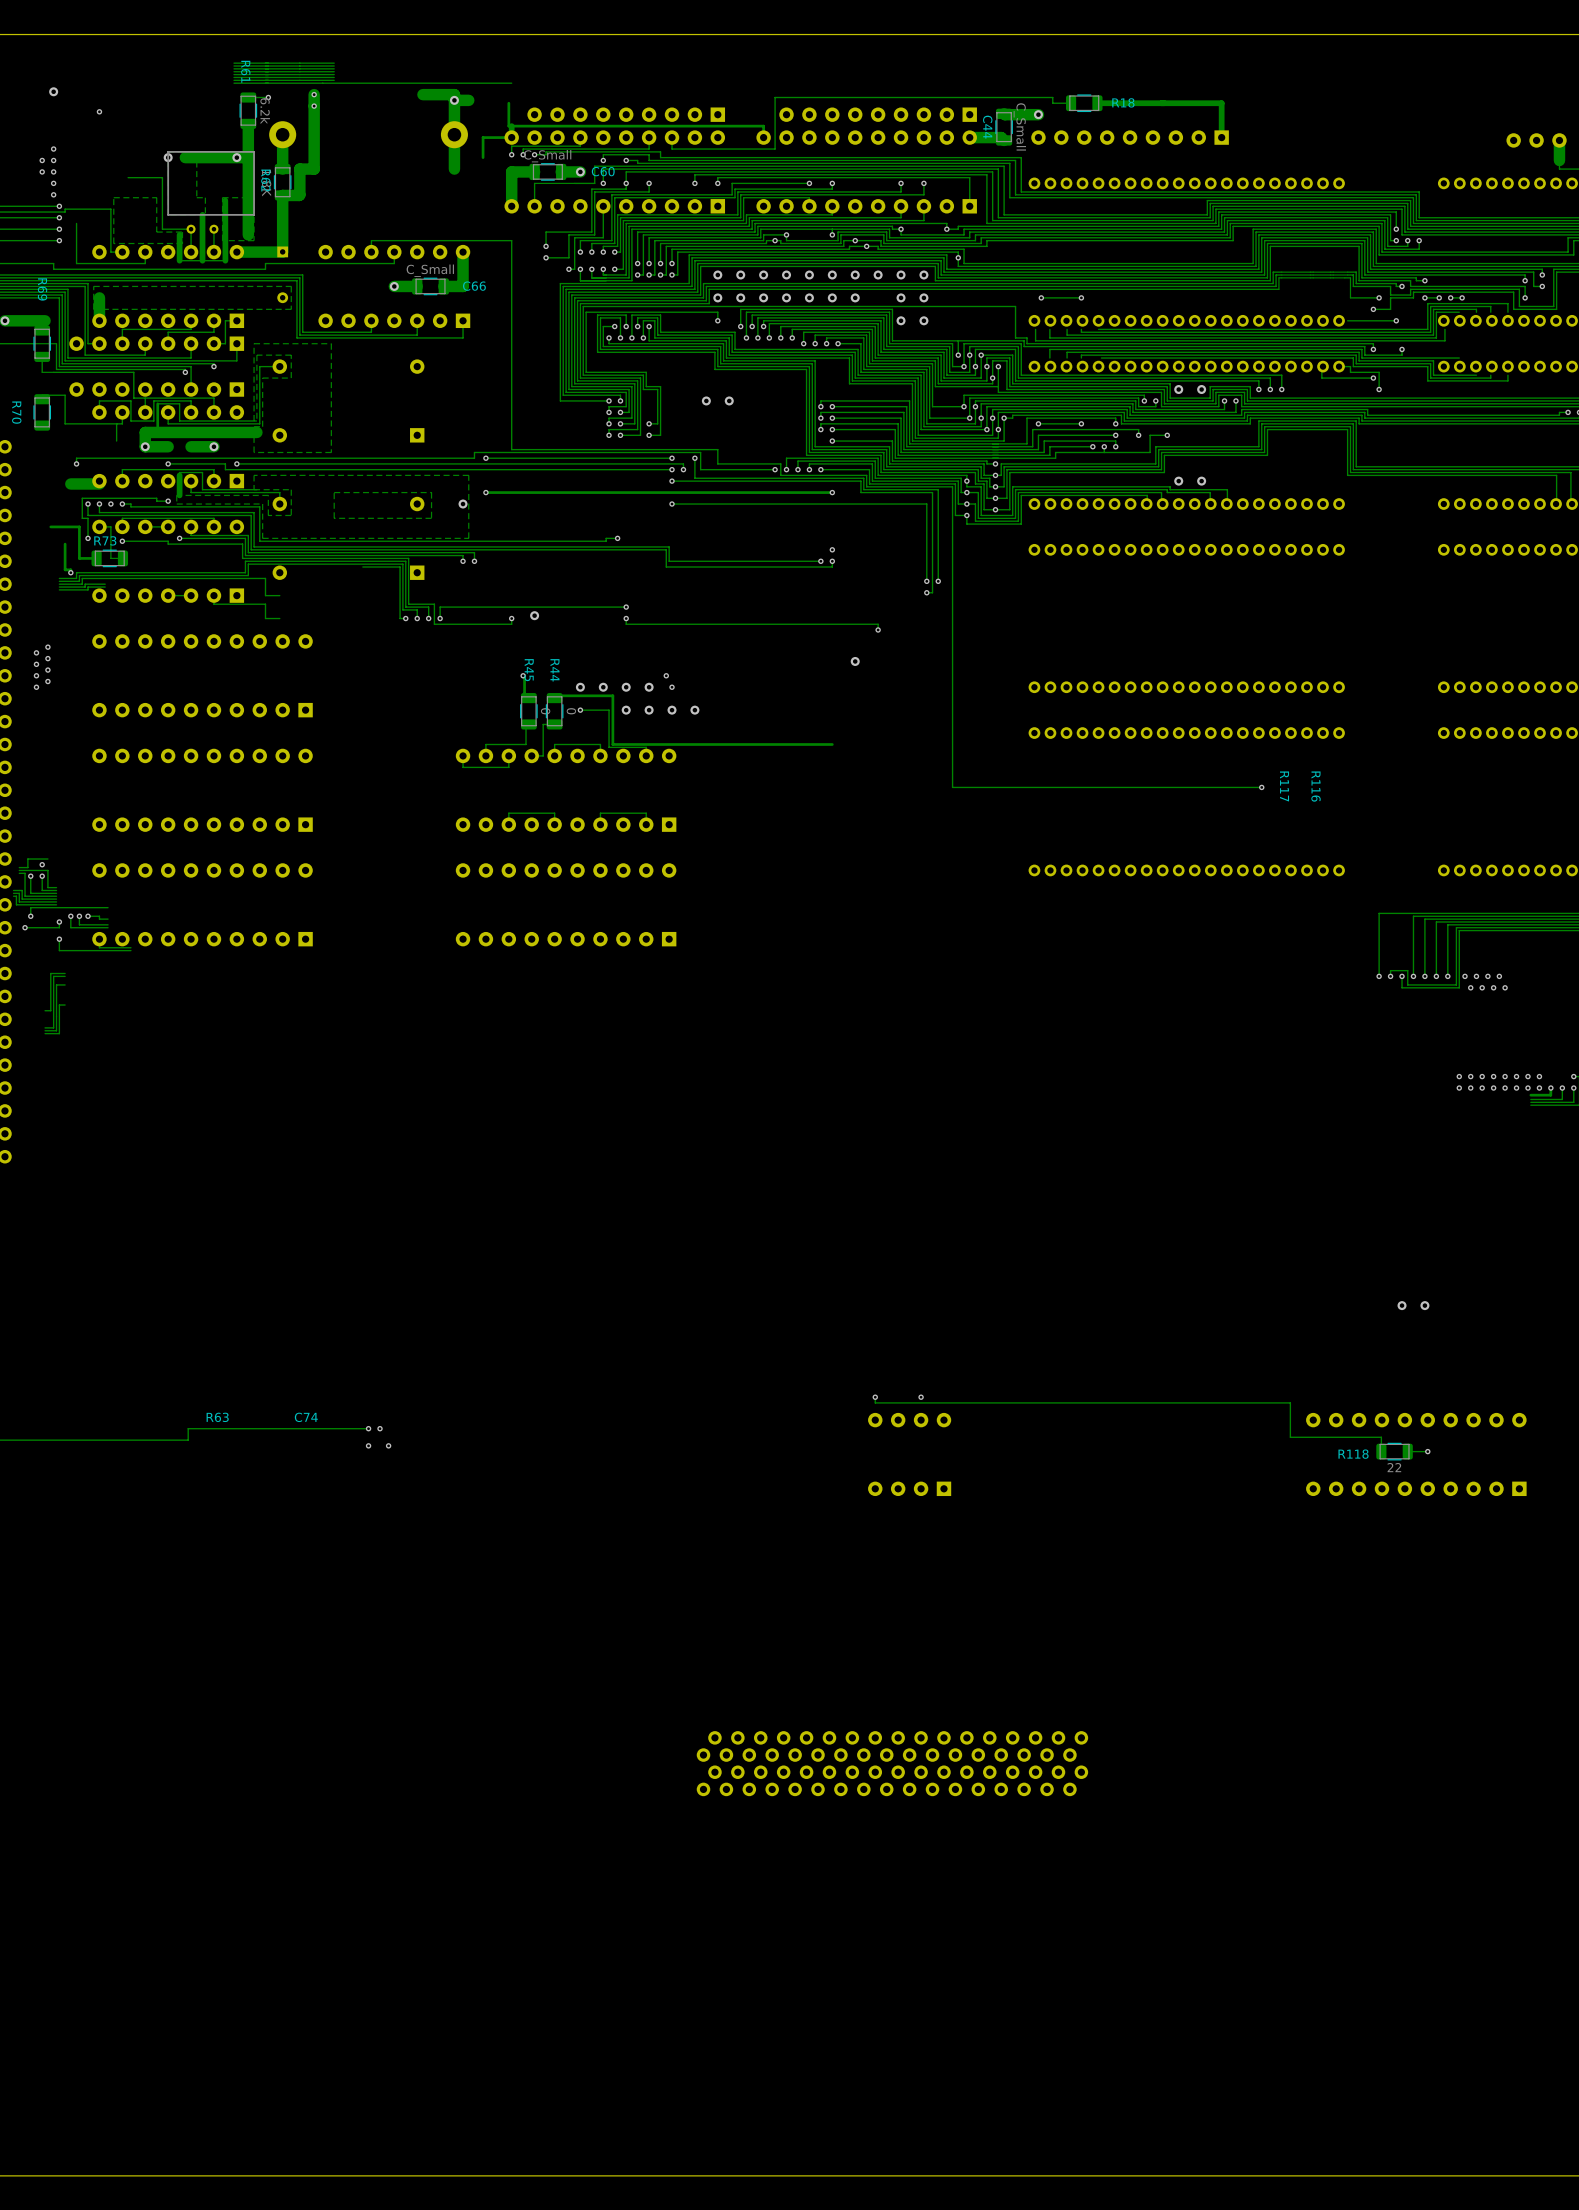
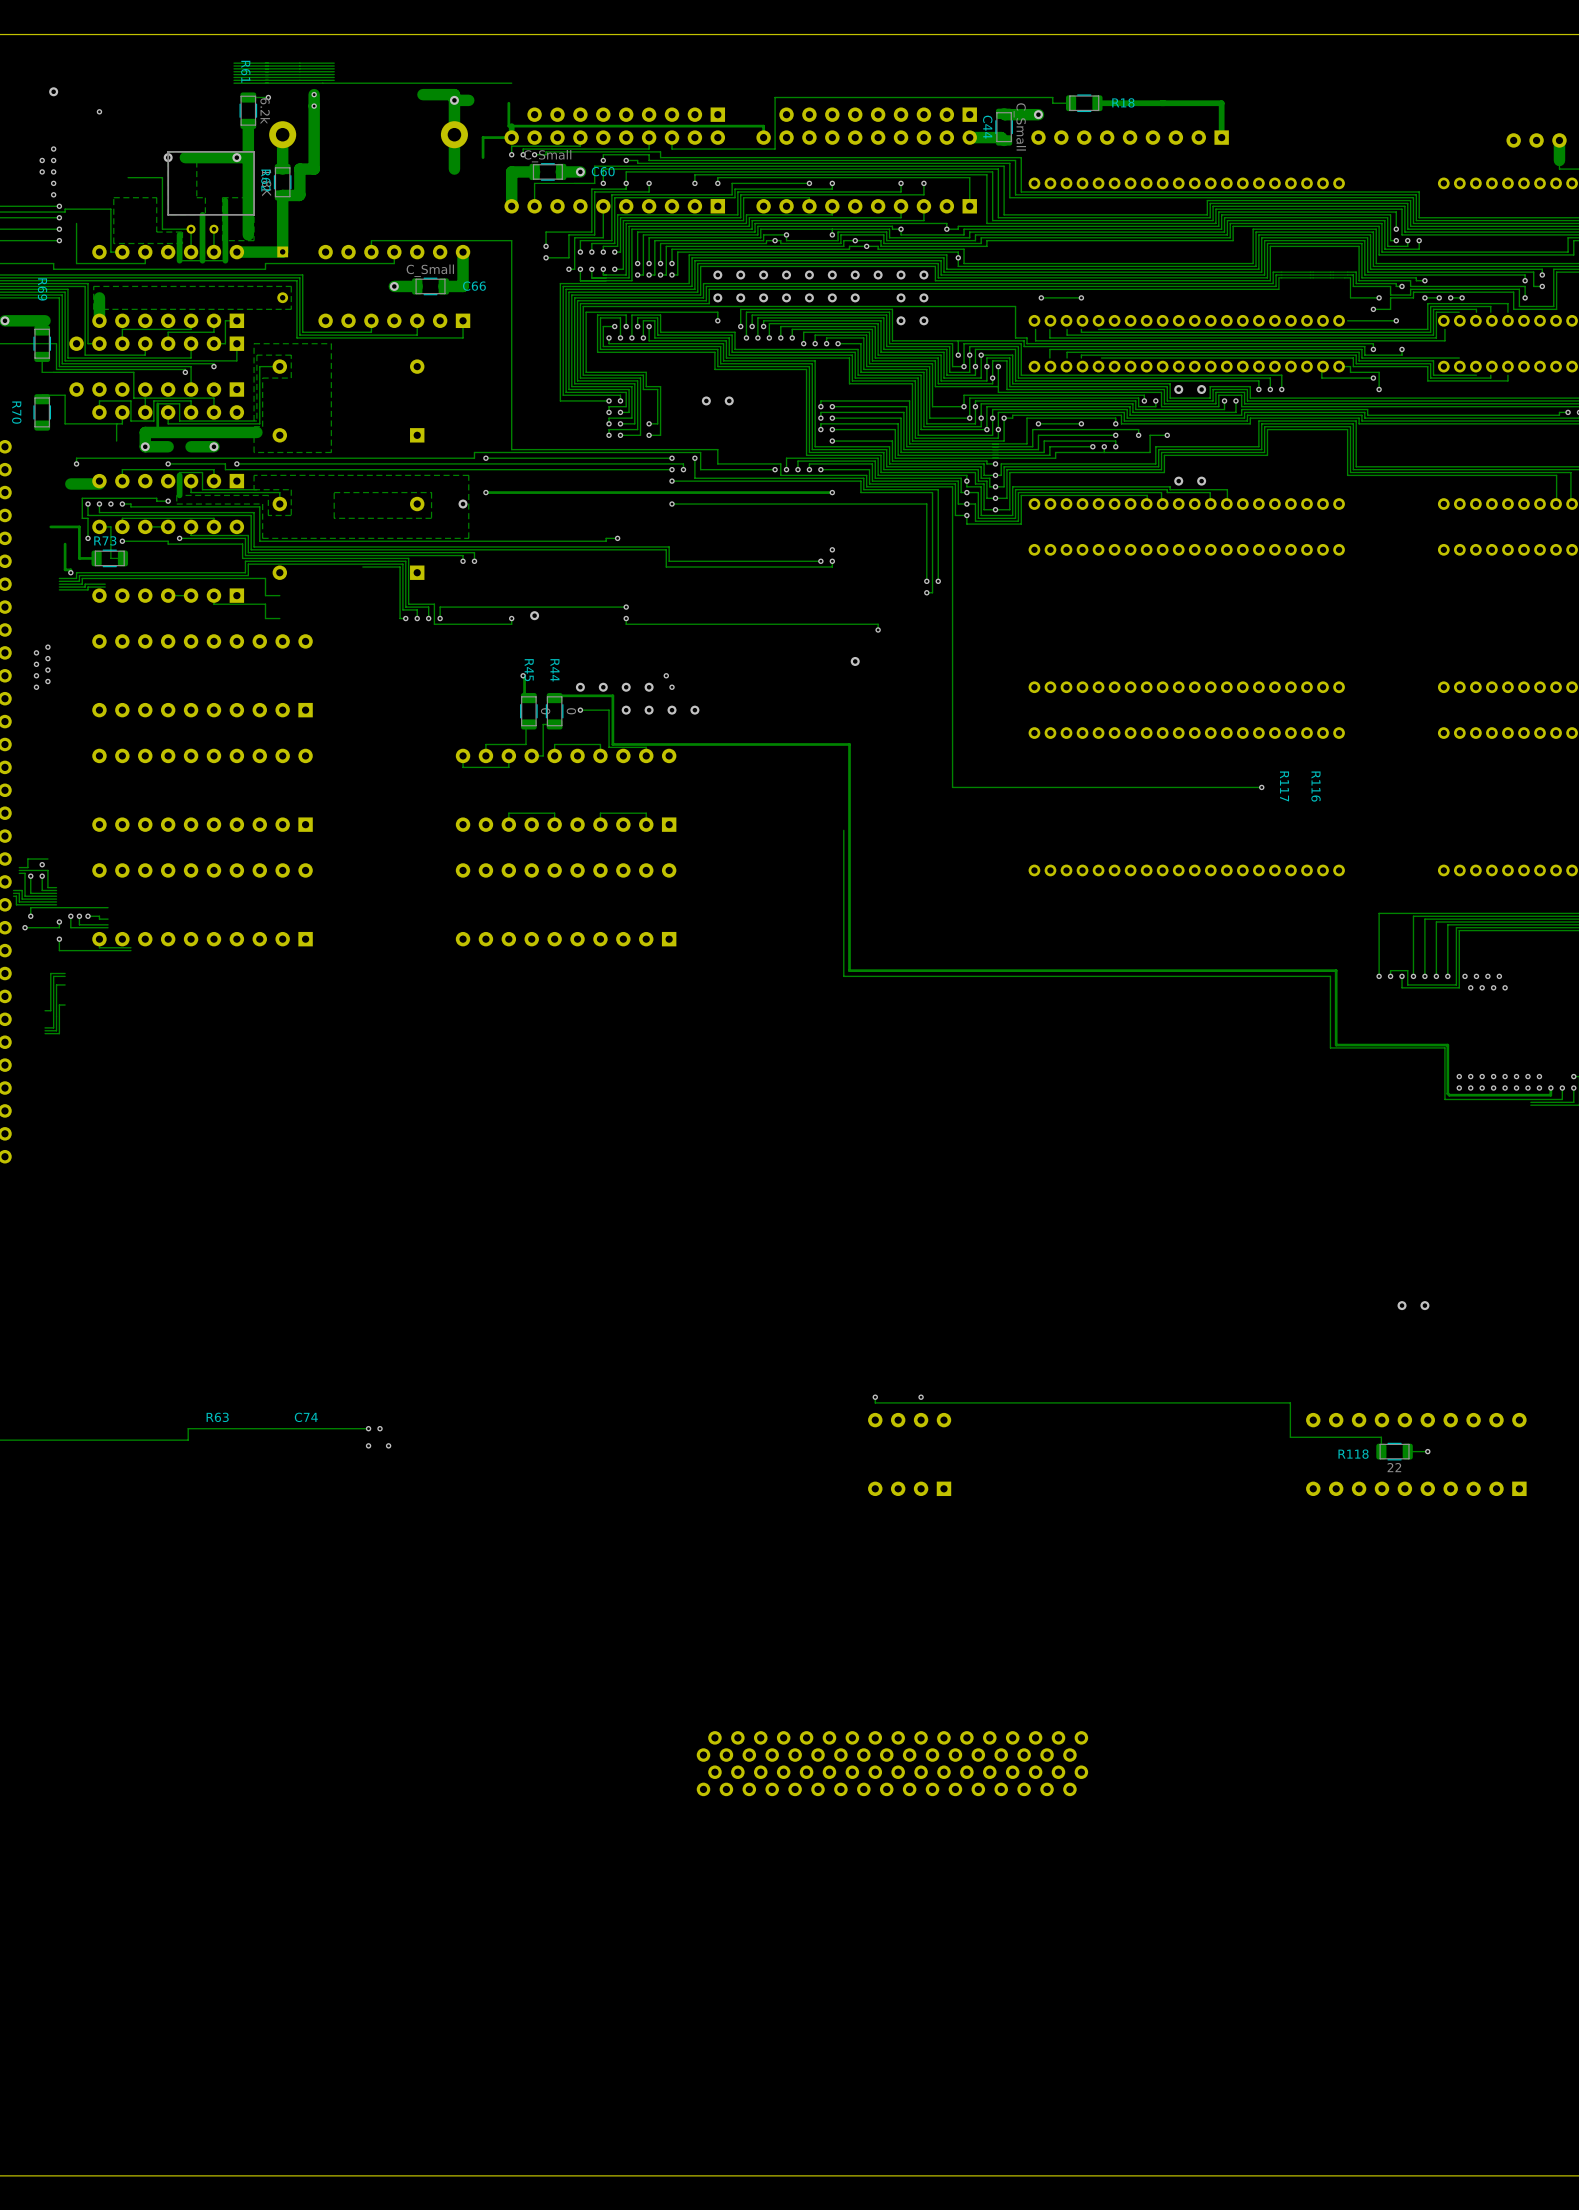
track: none -> (832, 744) (849, 744) (849, 970) (1336, 970) (1336, 1045) (1447, 1045) (1449, 1095) (1530, 1095)
track: none -> (843, 830) (843, 976) (1330, 976) (1330, 1047) (1444, 1047) (1444, 1099) (1530, 1099)

